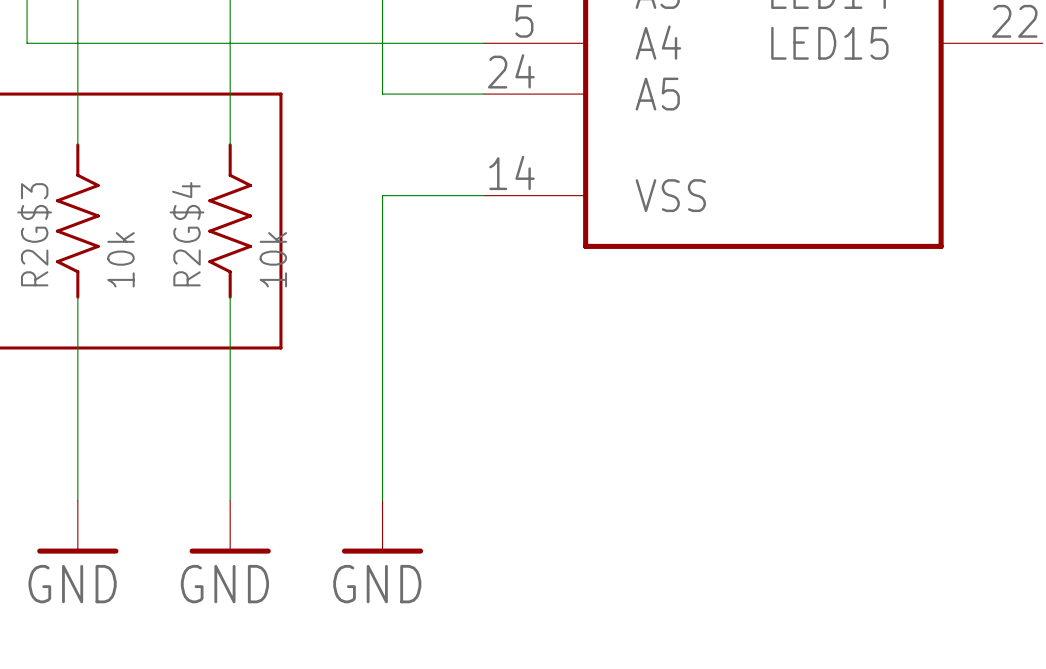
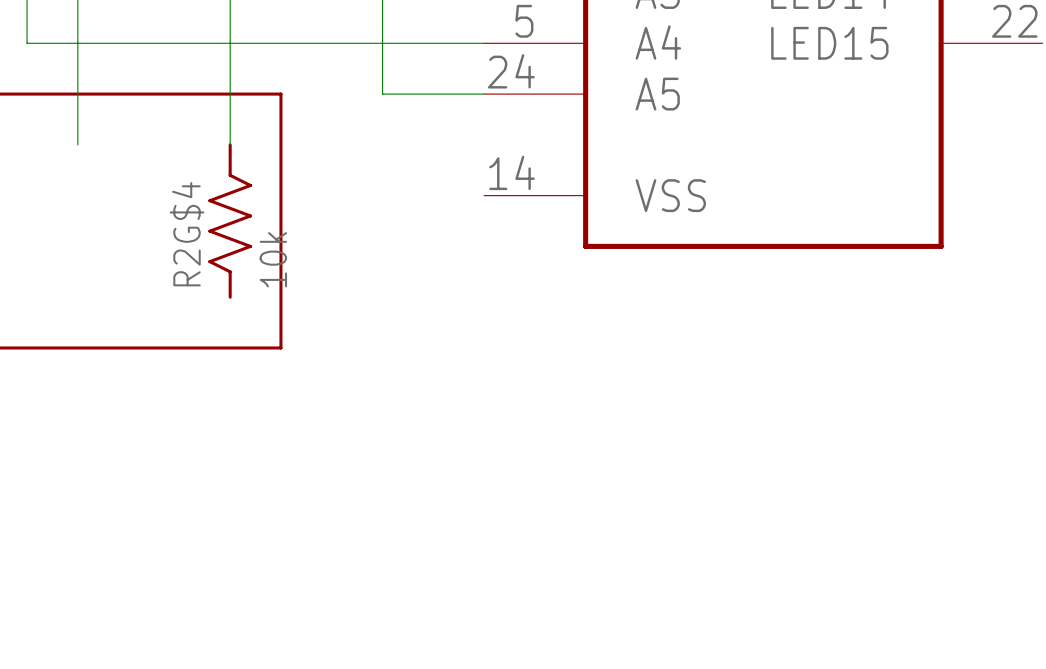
wire: (484, 195) (382, 195) (382, 500) -> none
R2G$3: 10k (77, 221) -> none
wire: (77, 297) (77, 500) -> none
wire: (230, 297) (230, 500) -> none
power symbol: GND (77, 526) -> none
power symbol: GND (230, 526) -> none
power symbol: GND (382, 526) -> none

